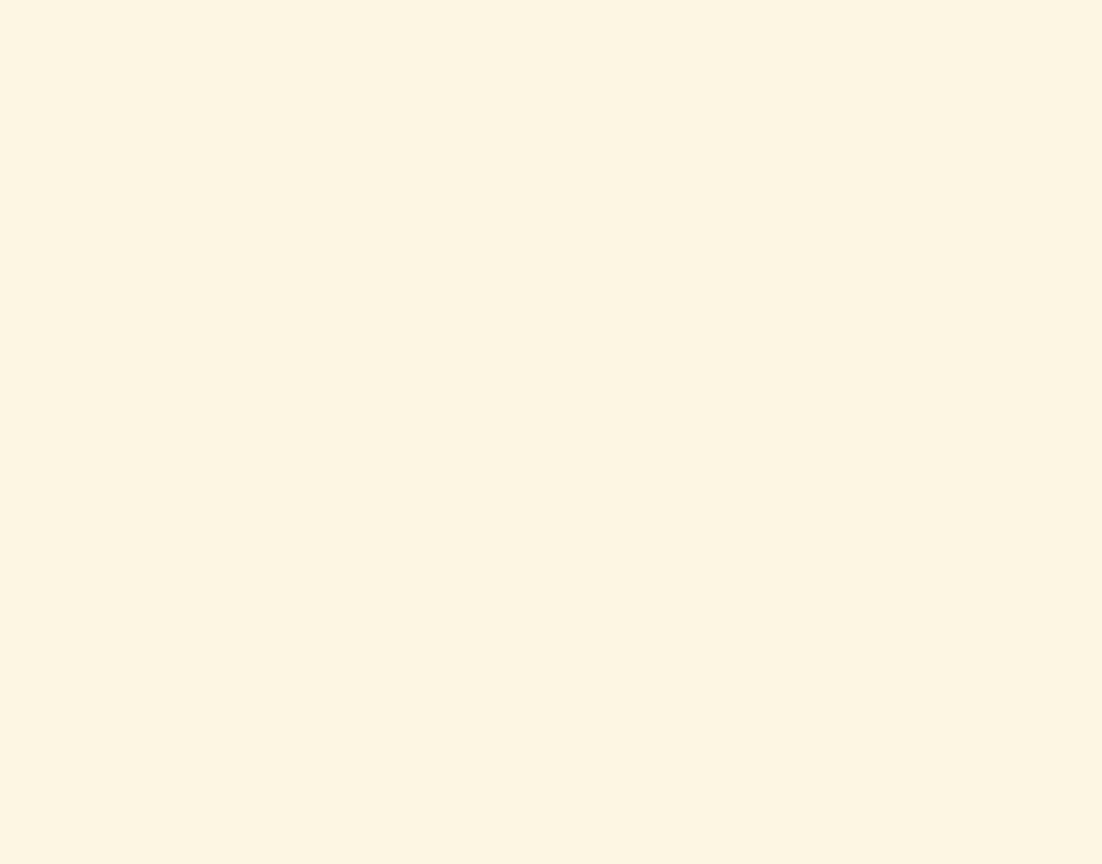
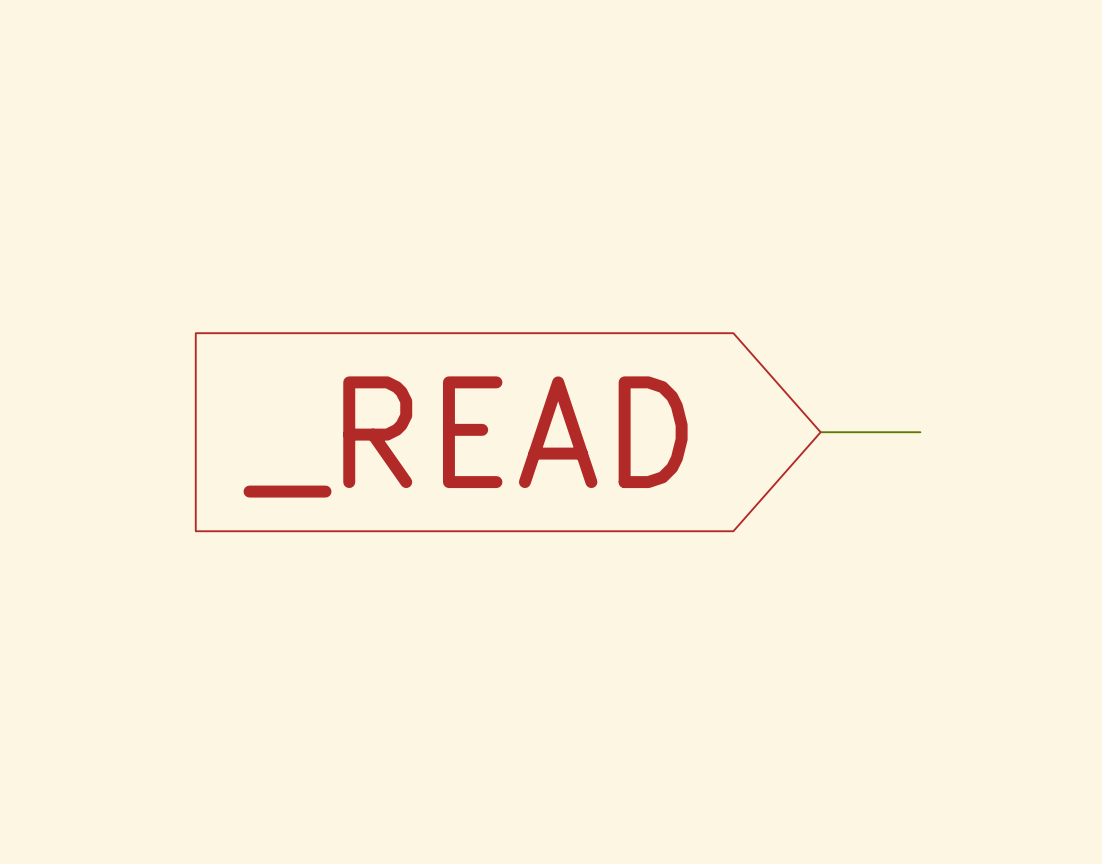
wire: none -> (820, 432) (920, 432)
global label: none -> _READ (465, 436)

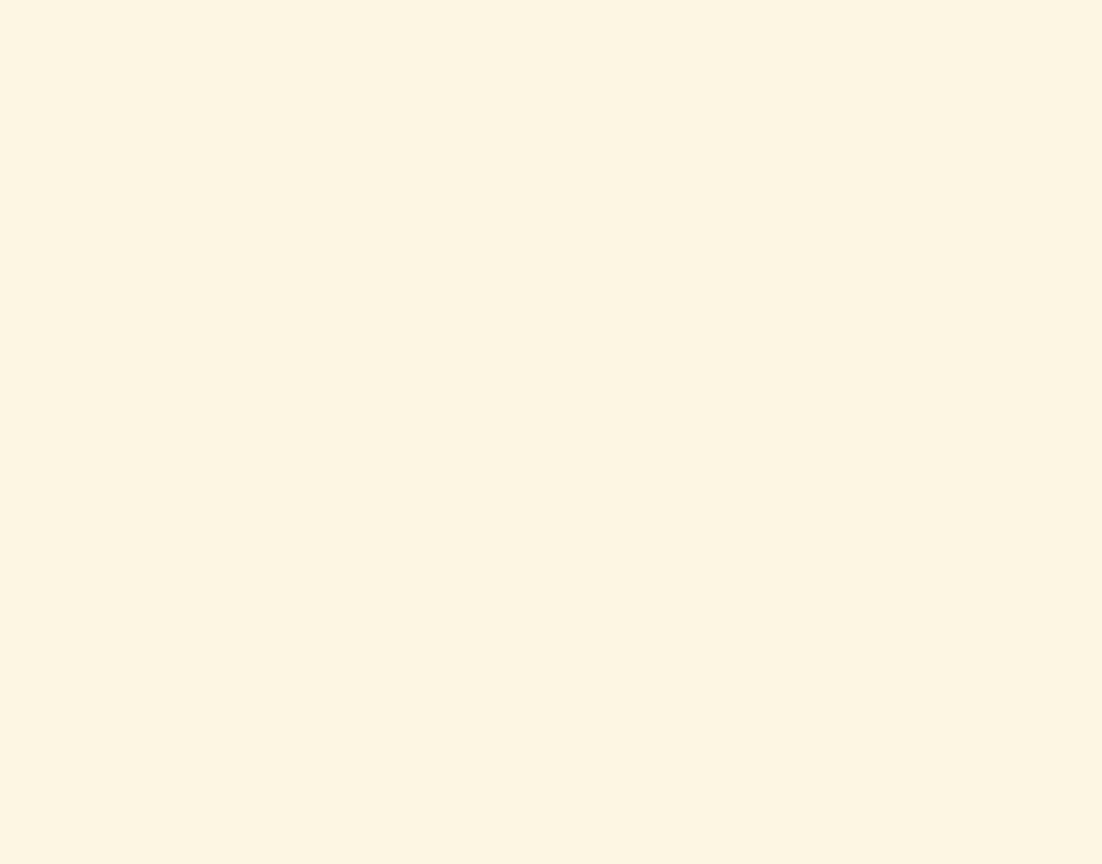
wire: (820, 432) (920, 432) -> none
global label: _READ (465, 436) -> none

